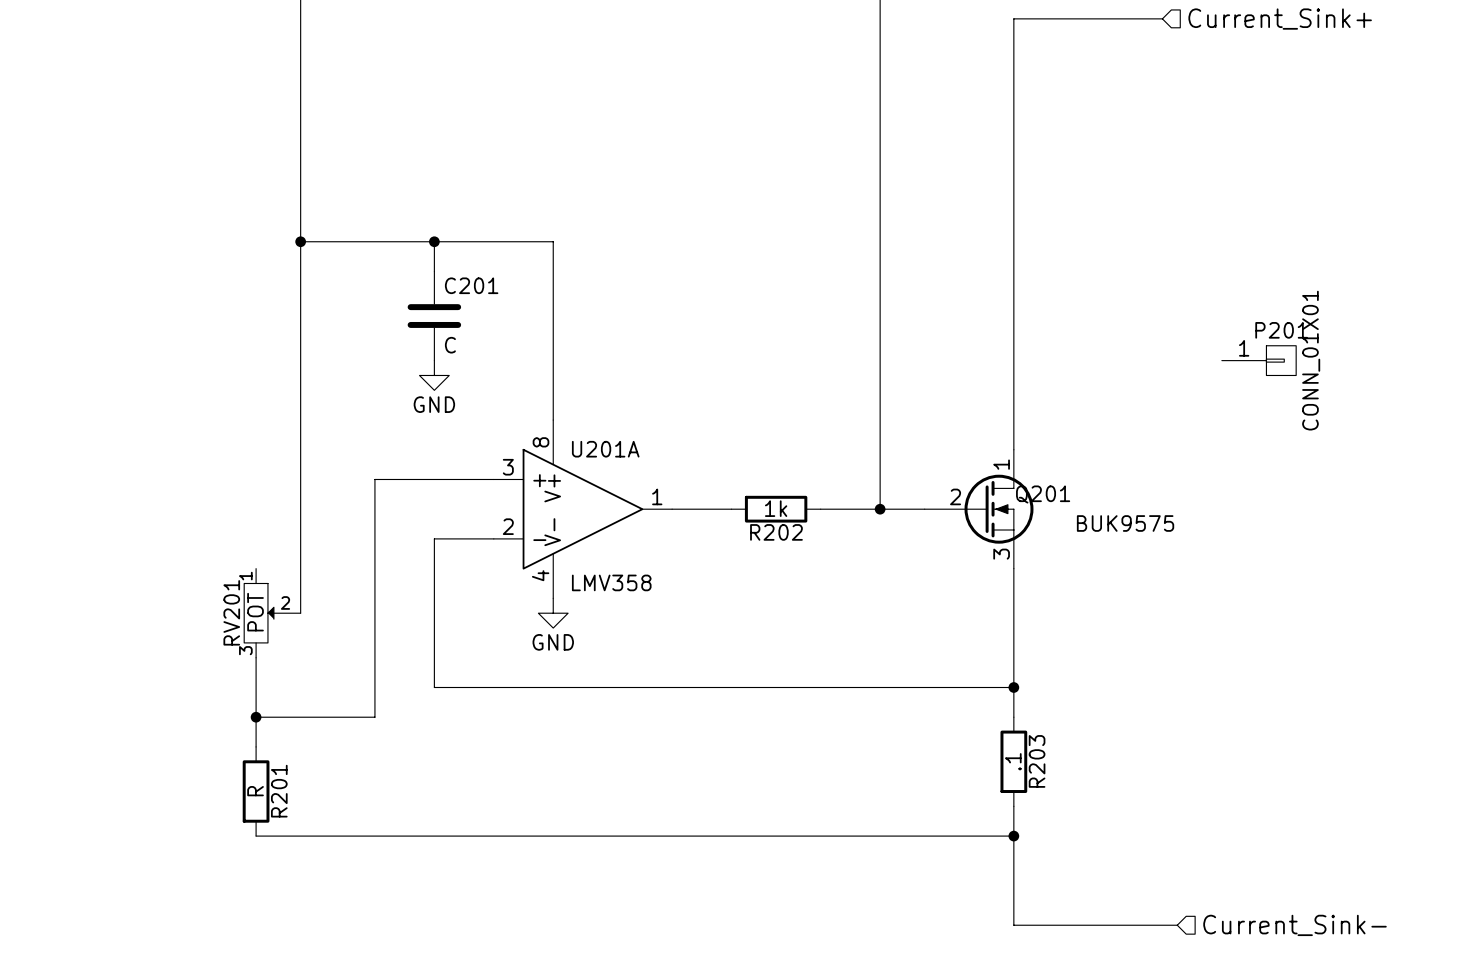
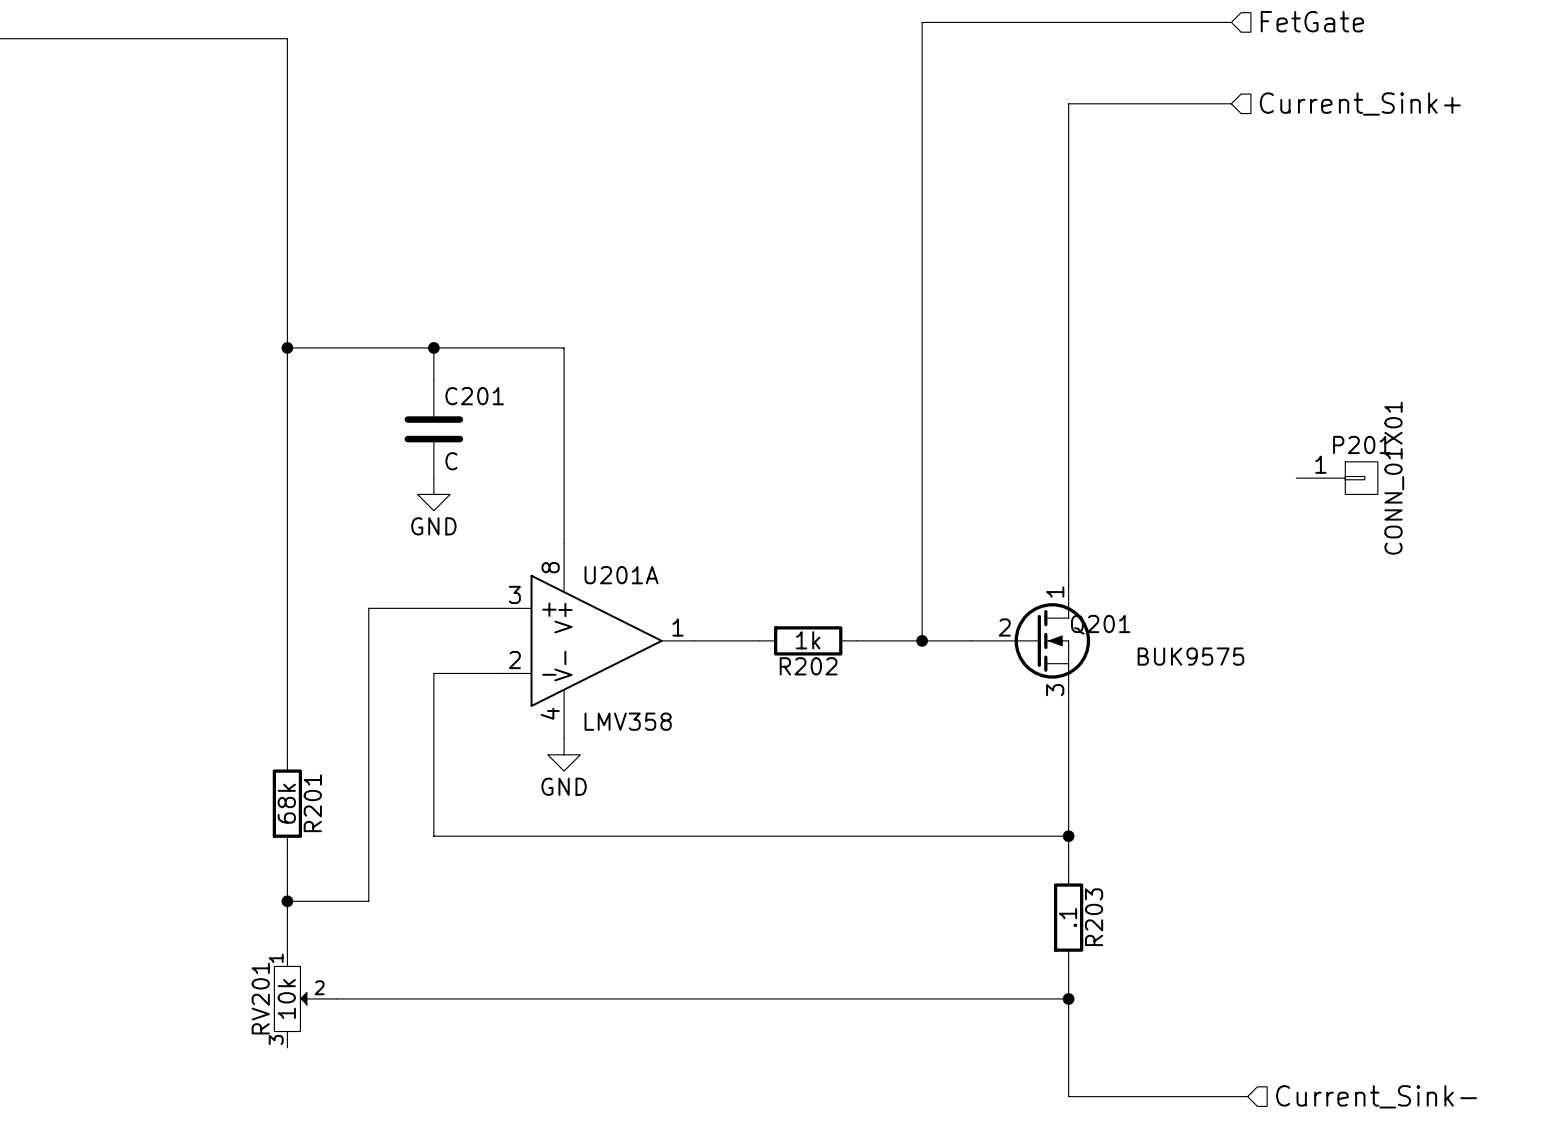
RV201 value: POT (255, 612) -> 10k (286, 998)
RV201 position: (272, 613) -> (305, 998)
wire: (256, 657) (256, 746) -> (287, 852) (287, 950)
wire: (256, 717) (374, 717) -> (287, 901) (368, 901) (368, 868)
junction position: (256, 717) -> (287, 901)
R201 value: R (255, 791) -> 68k (286, 803)
R201 position: (256, 791) -> (287, 803)
wire: (256, 836) (345, 836) -> none

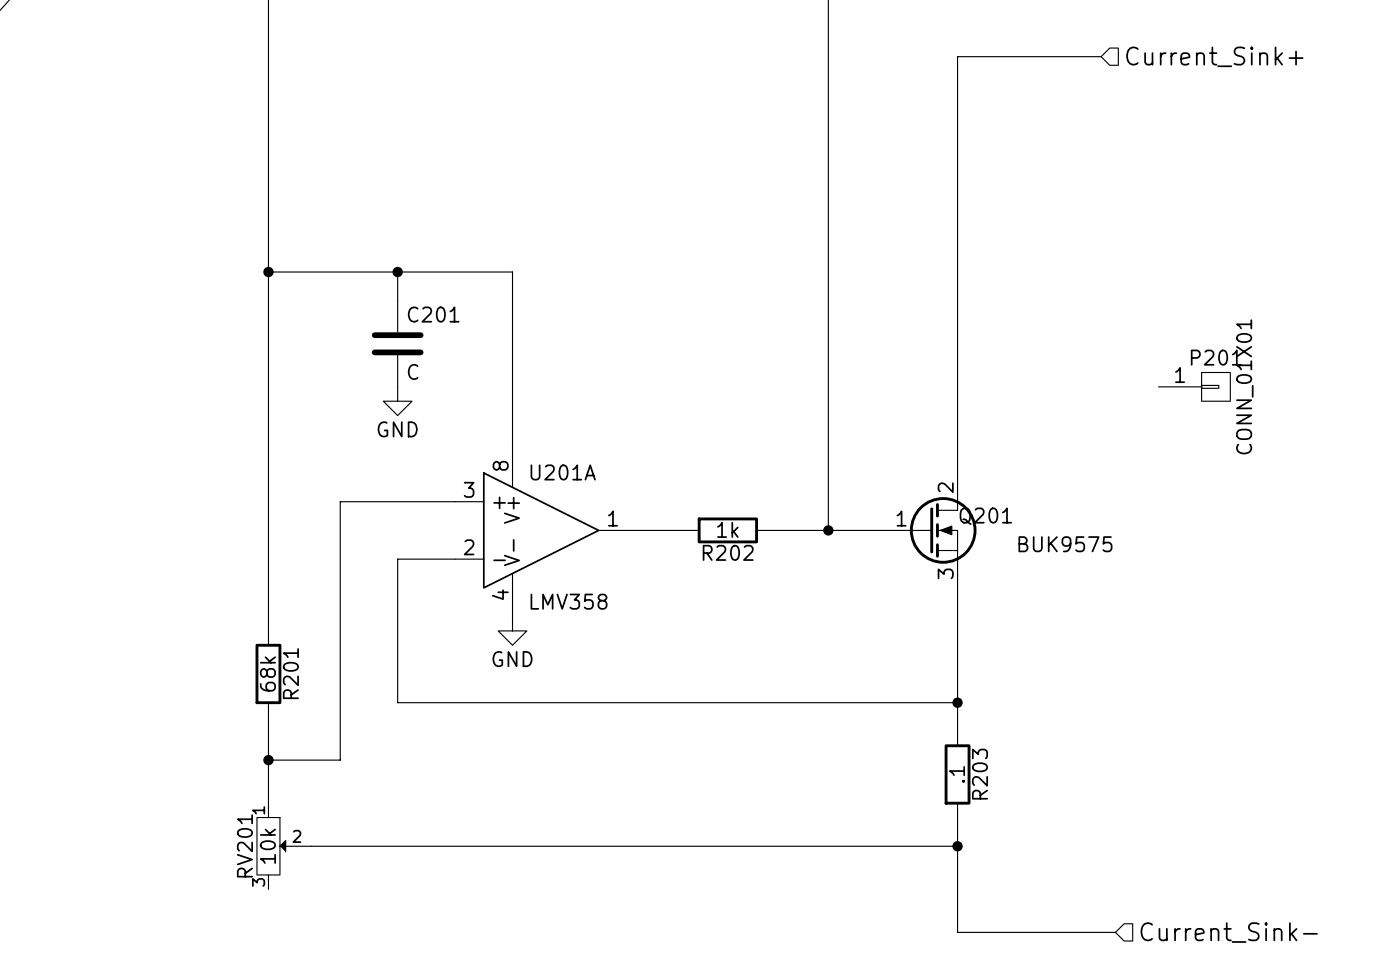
Q201 pin number: 1 (1055, 592) -> 2 (945, 487)
Q201 pin number: 2 (1004, 627) -> 1 (901, 518)

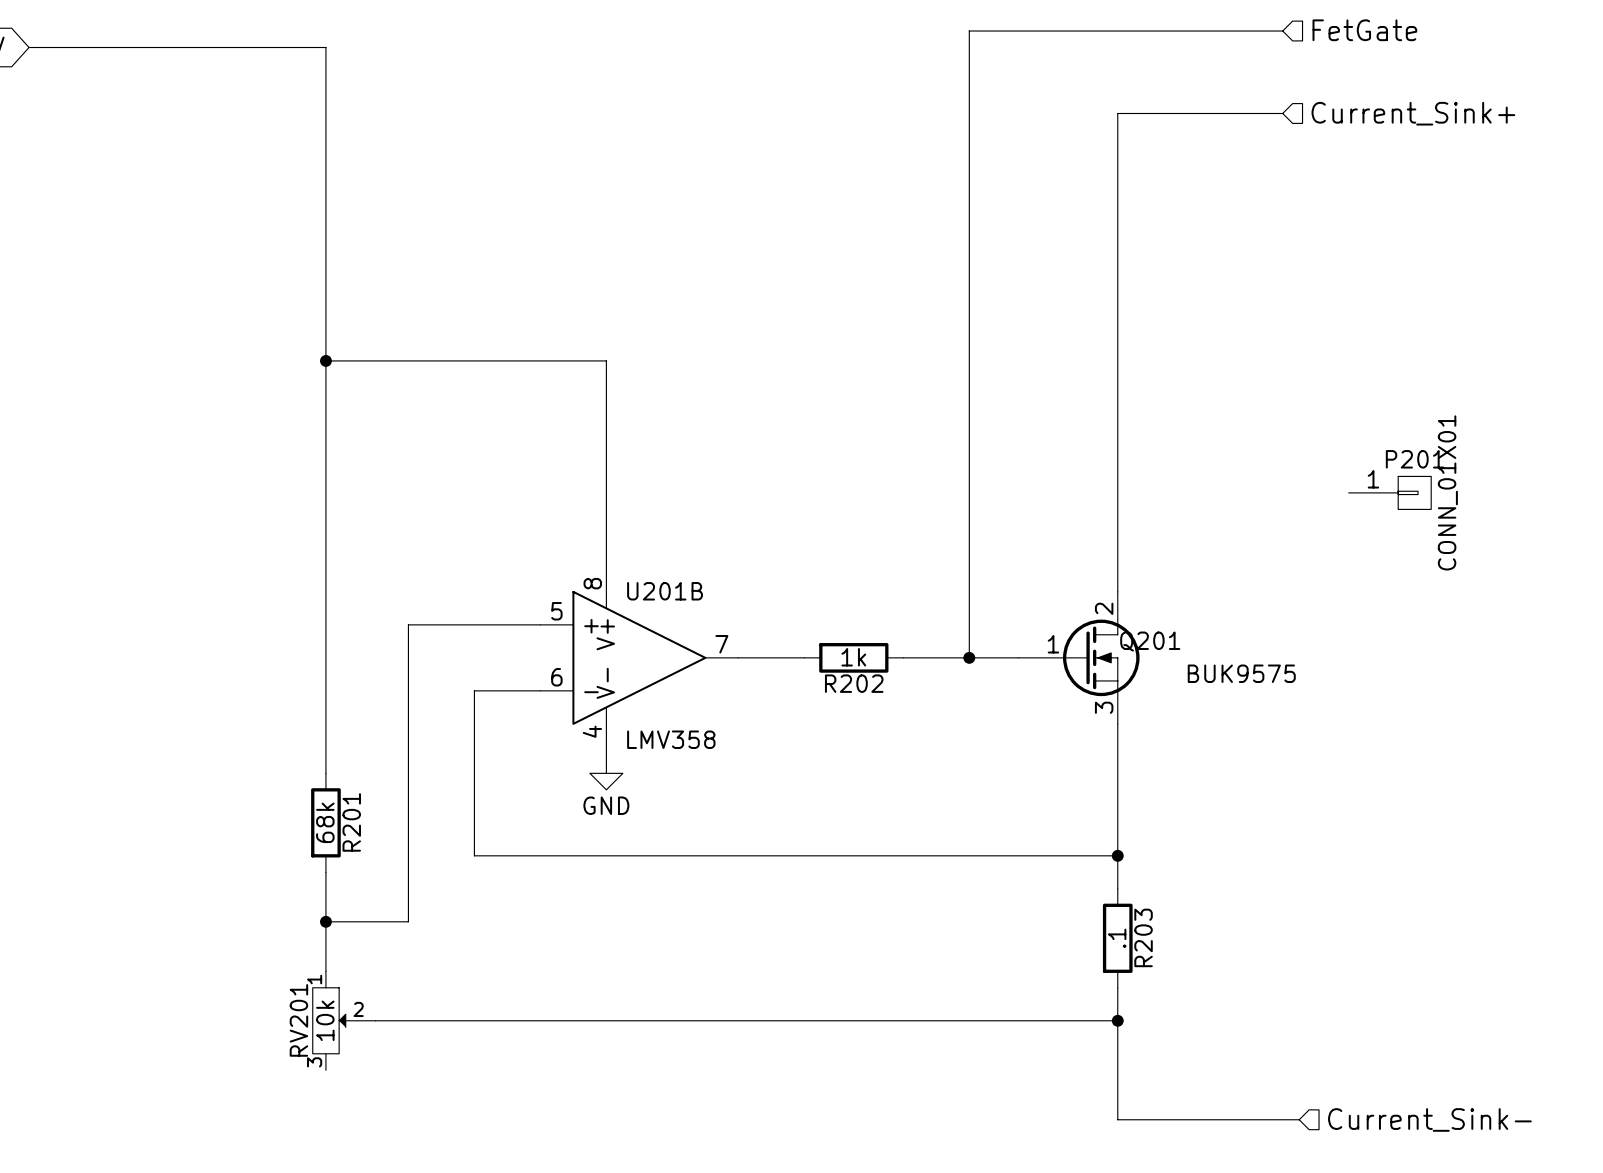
wire: (397, 272) (397, 300) -> none
junction: (397, 272) -> none
C201: C (397, 343) -> none
power symbol: GND (397, 401) -> none
U201A name: U201A (563, 472) -> U201B (665, 591)
U201A pin number: 3 (469, 489) -> 5 (556, 611)
U201A pin number: 1 (613, 518) -> 7 (721, 644)
U201A pin number: 2 (469, 547) -> 6 (556, 677)

